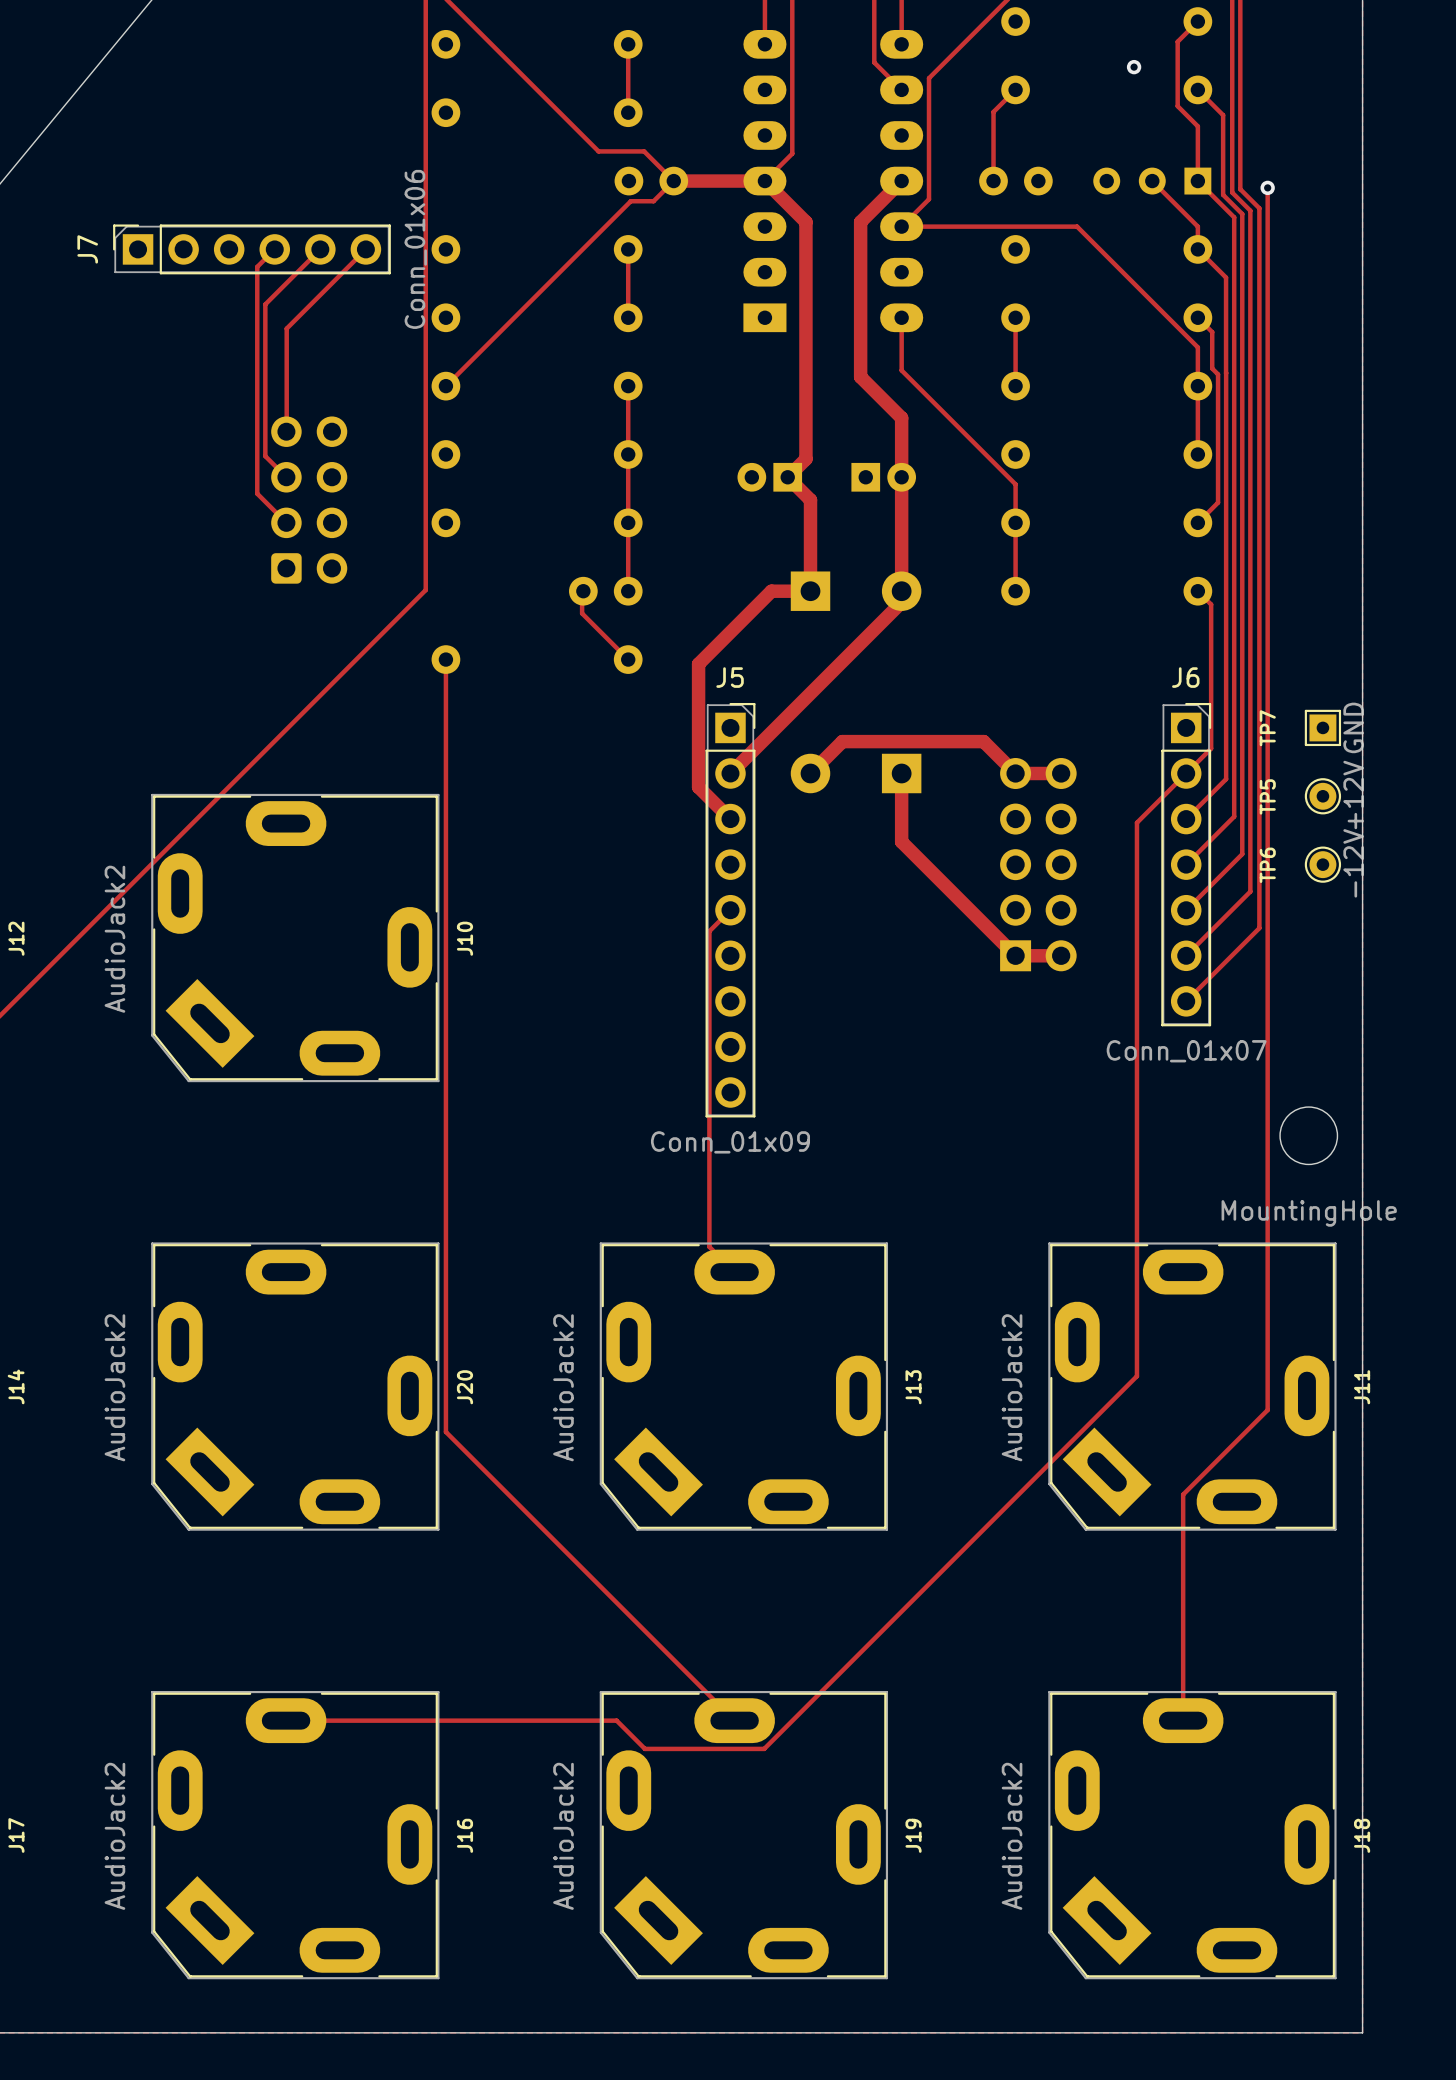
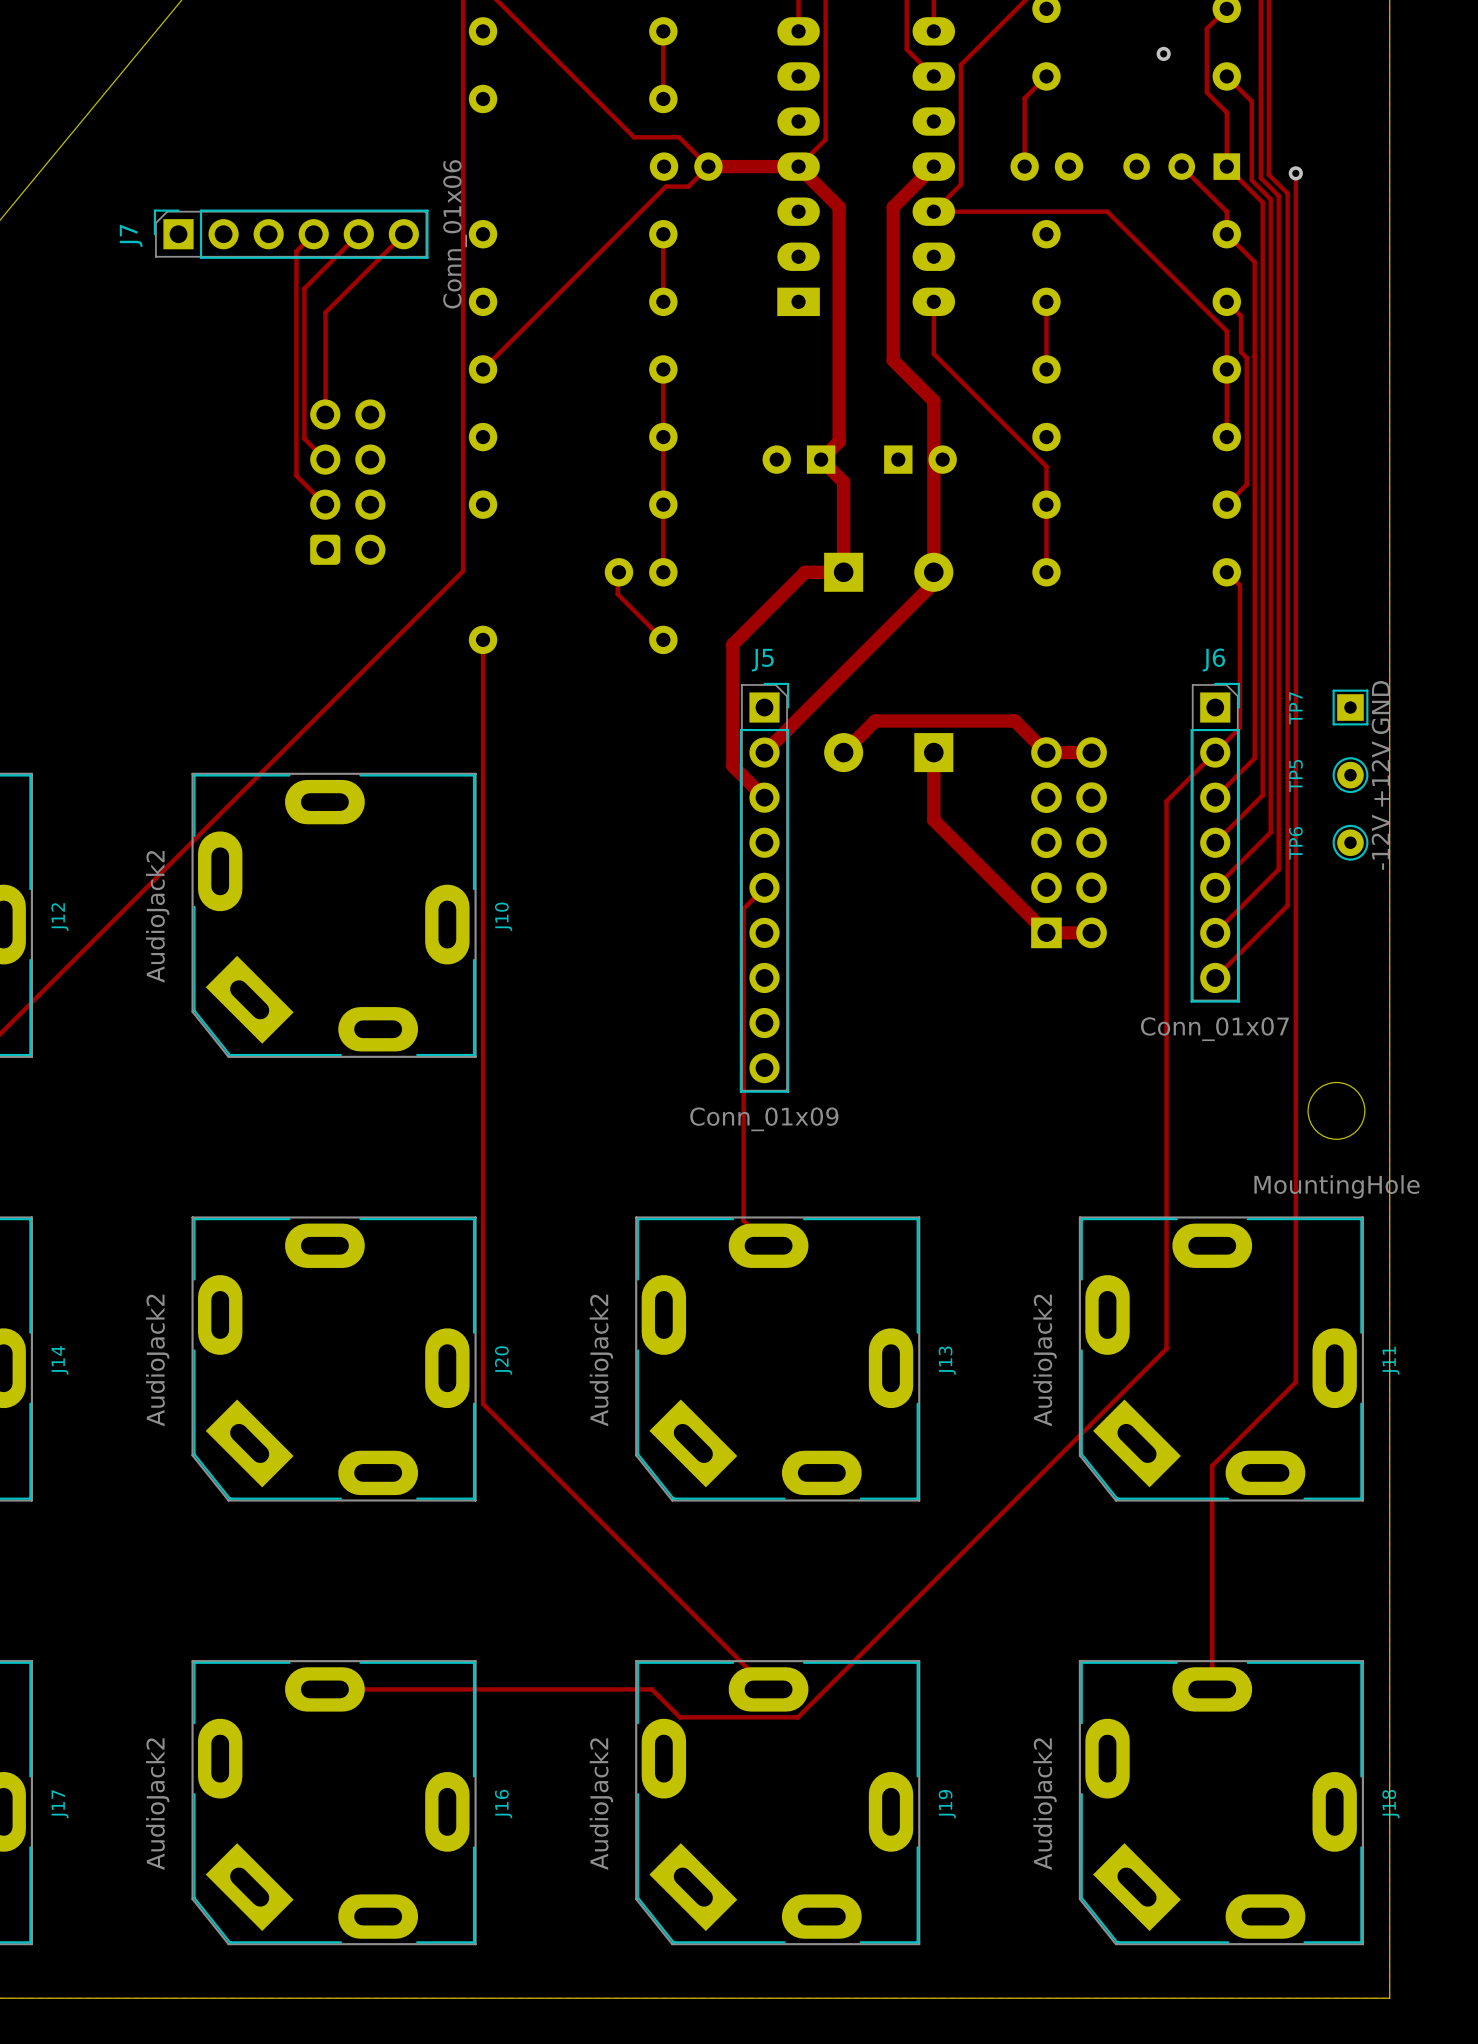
part footprint: [737, 462, 803, 492] -> [762, 445, 836, 474]
part footprint: [851, 462, 917, 492] -> [884, 445, 957, 474]

